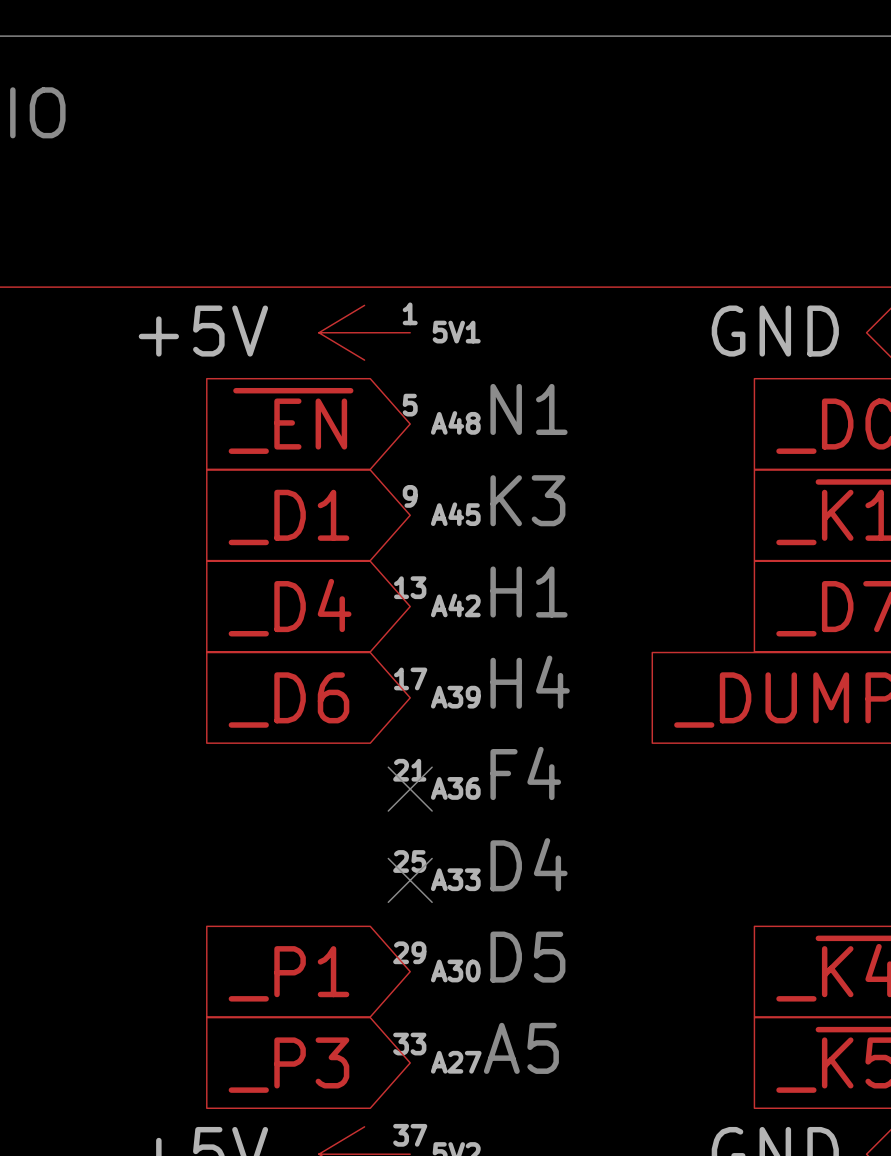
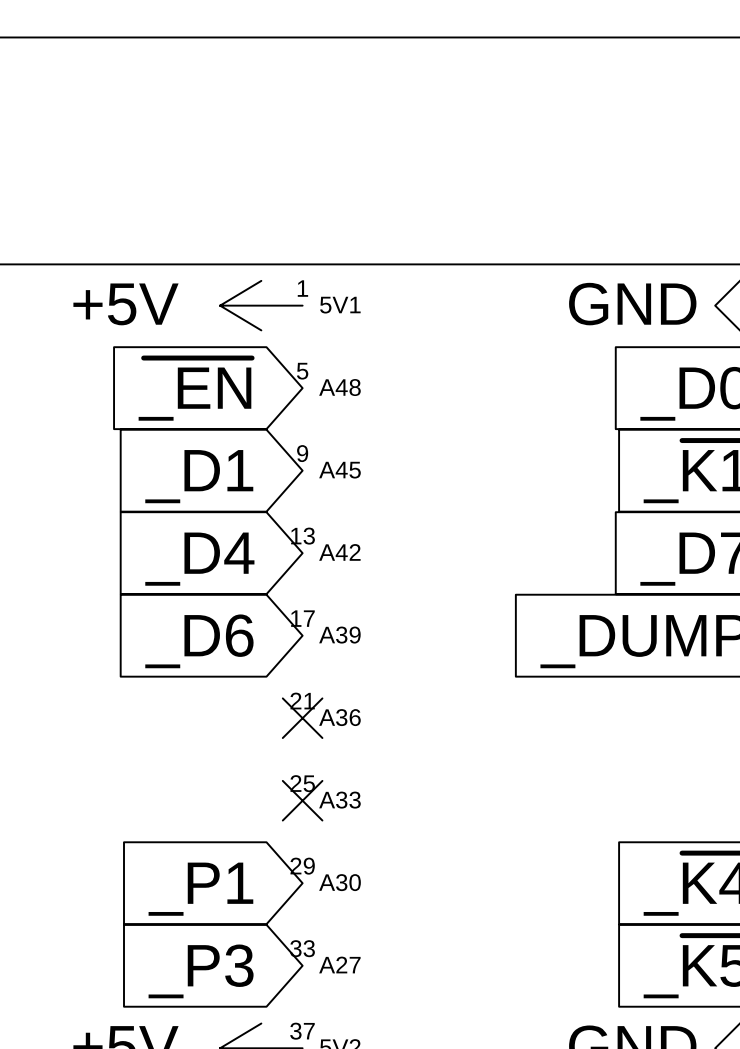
text: N1 (528, 409) -> none
text: K3 (527, 500) -> none
text: H1 (528, 592) -> none
text: H4 (530, 682) -> none
text: F4 (525, 773) -> none
text: D4 (528, 864) -> none
text: D5 (527, 957) -> none
text: A5 (521, 1048) -> none

